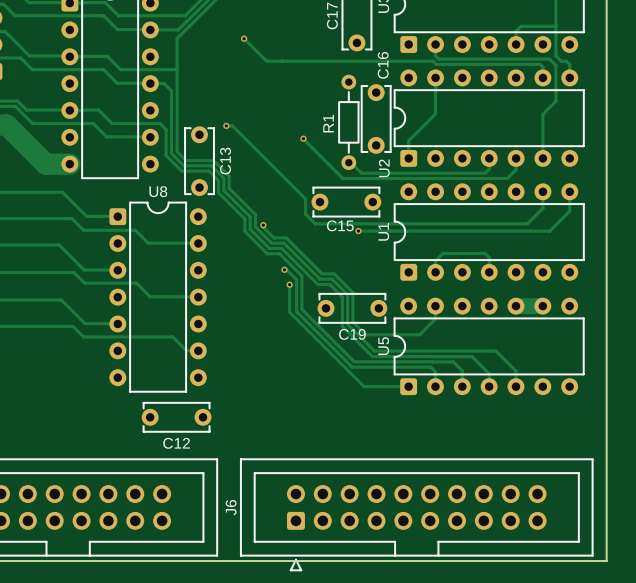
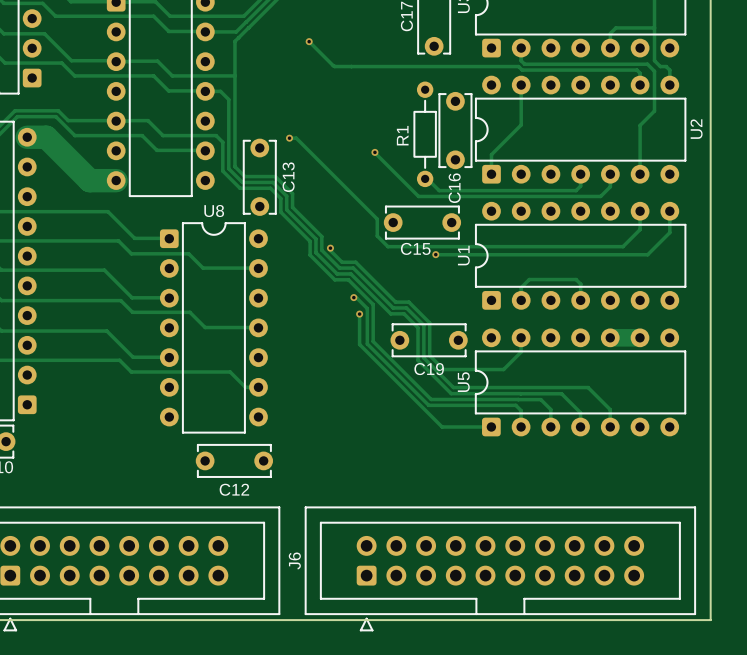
C16 name position: C16 (383, 65) -> C16 (454, 188)
U2 name position: U2 (384, 168) -> U2 (696, 129)

